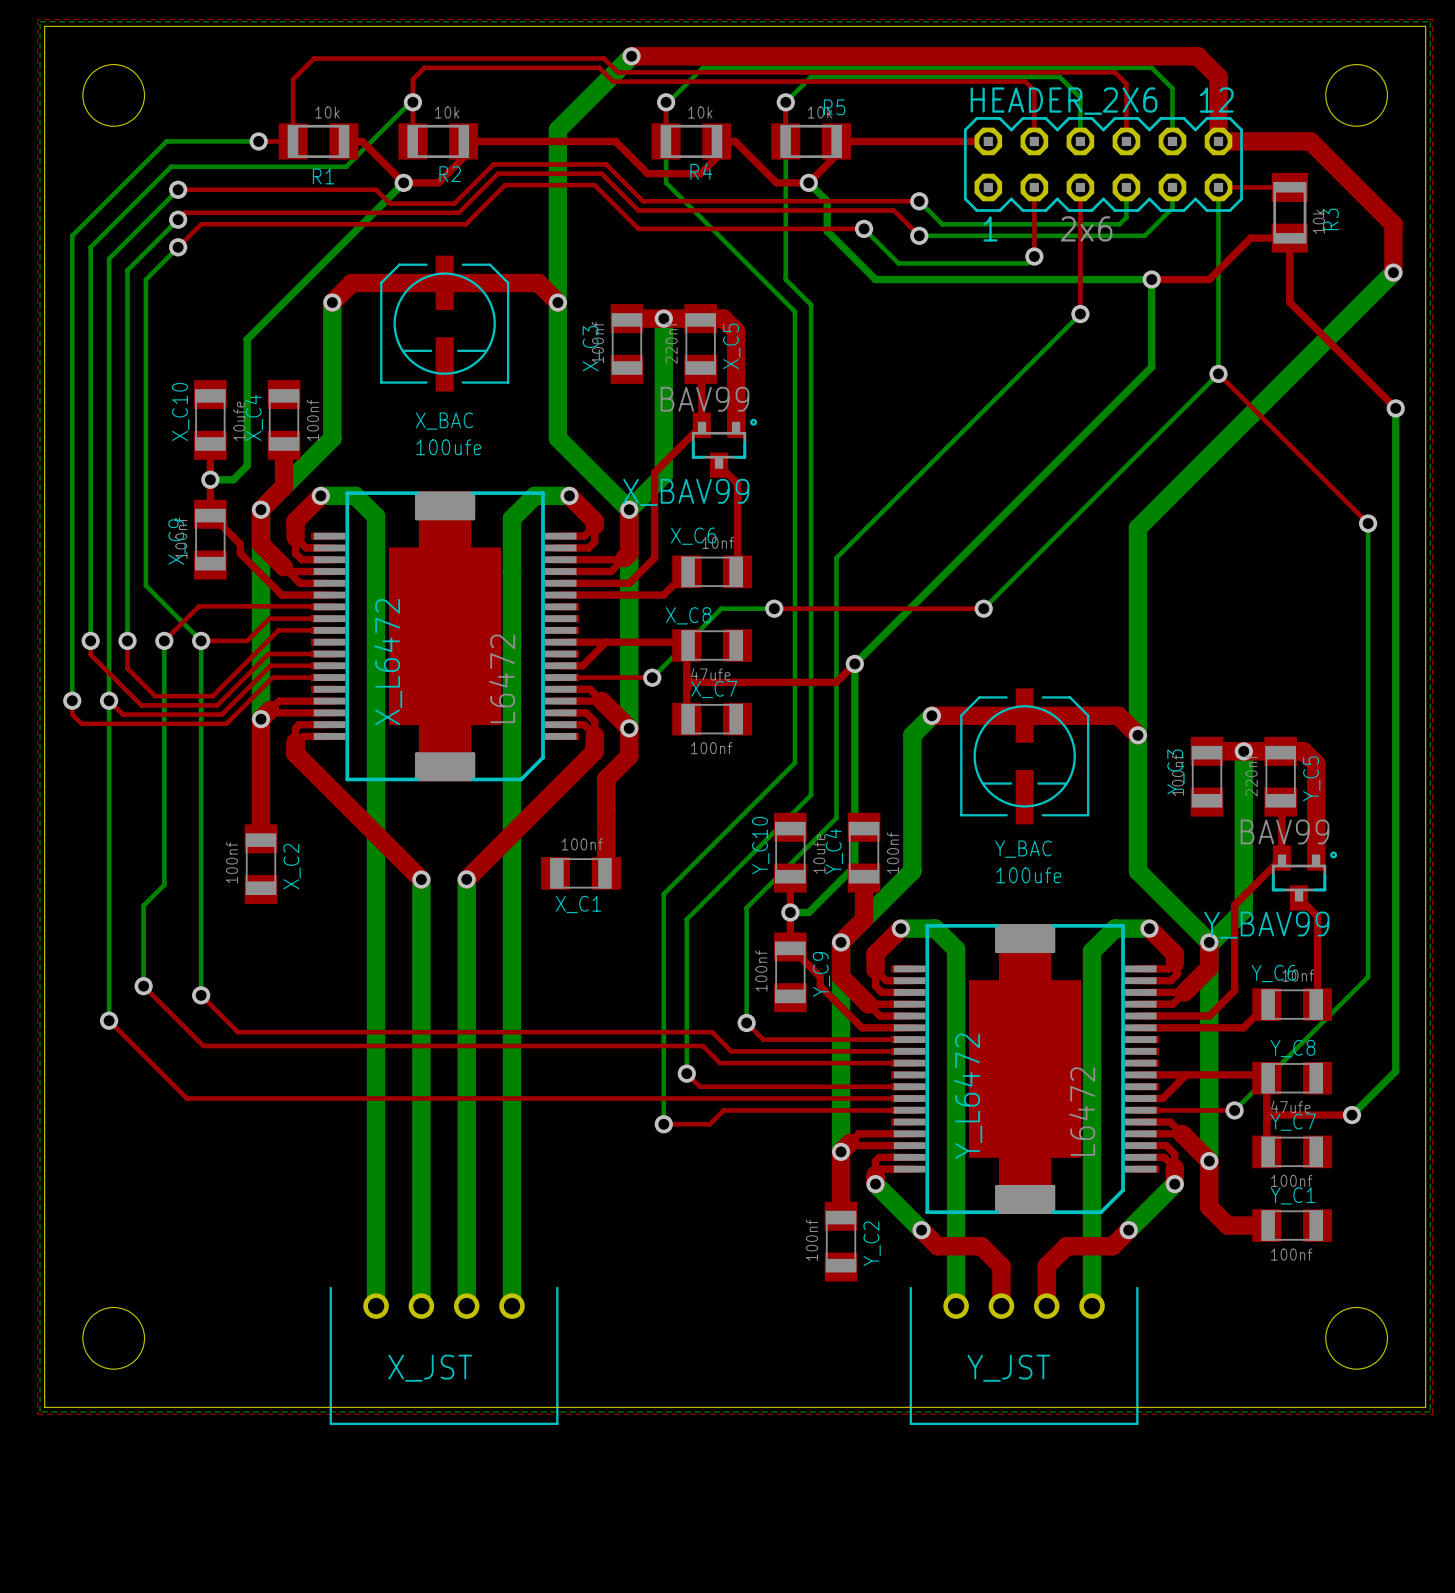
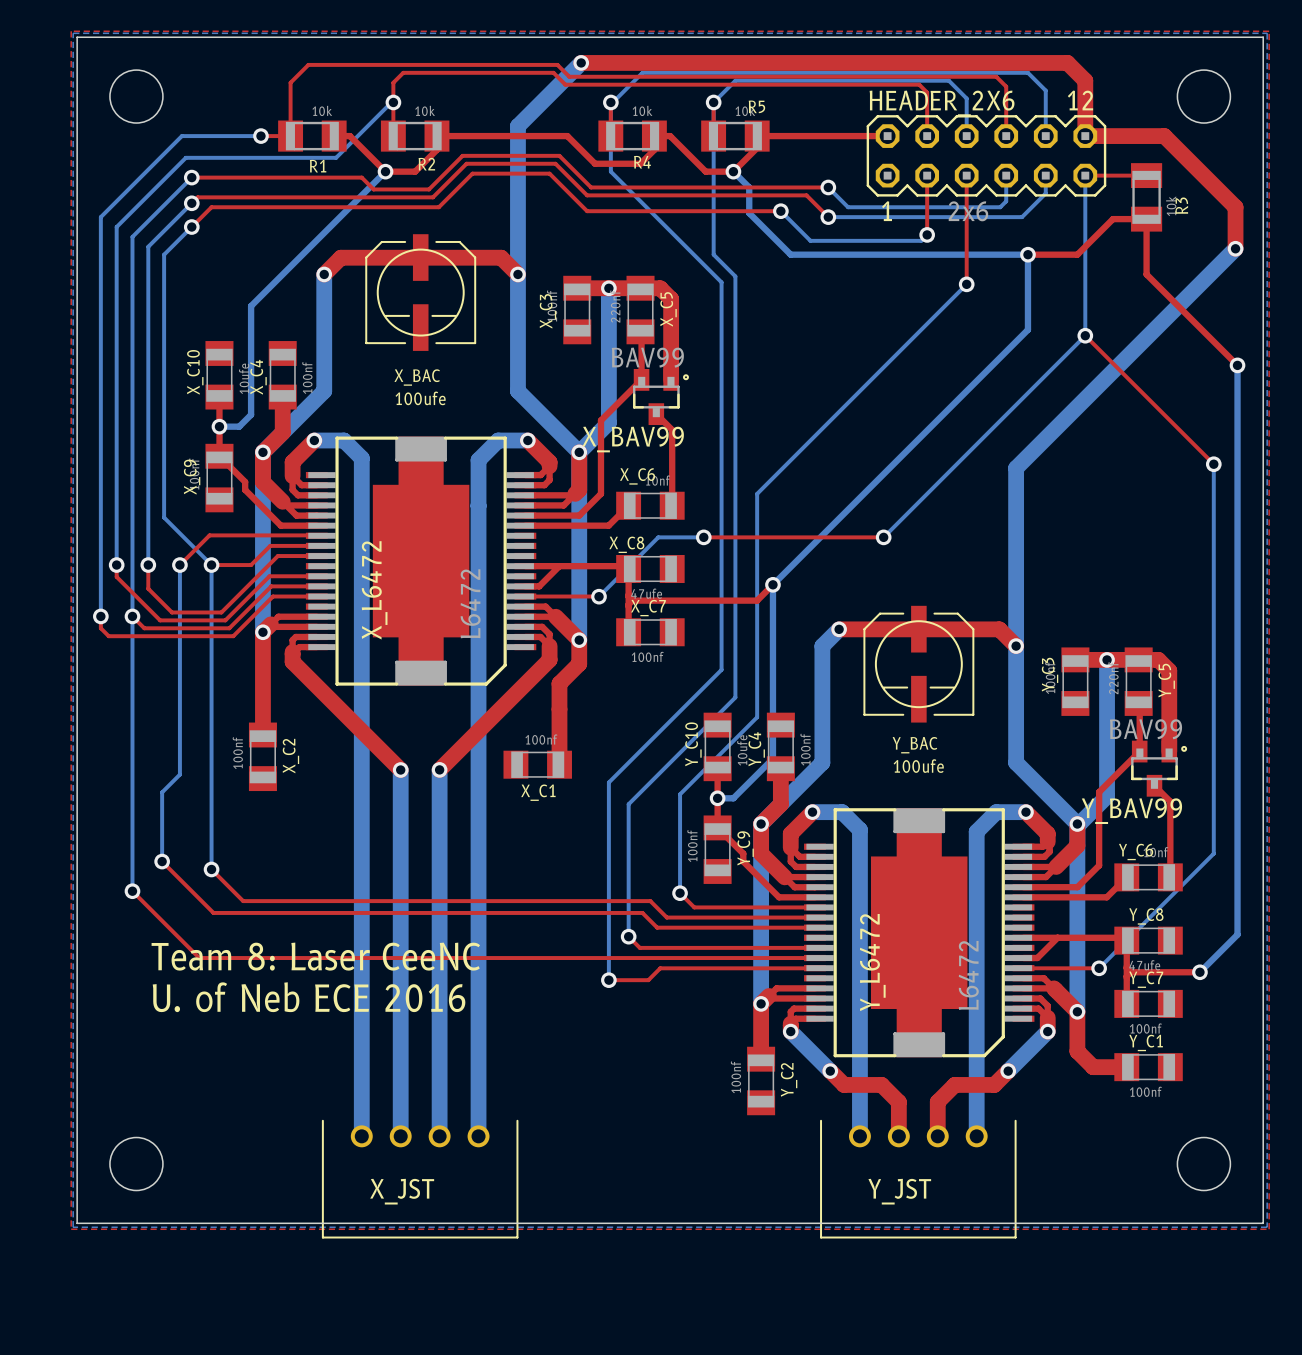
text: none -> Team 8: Laser CeeNC (315, 956)
text: none -> U. of Neb ECE 2016 (309, 997)

